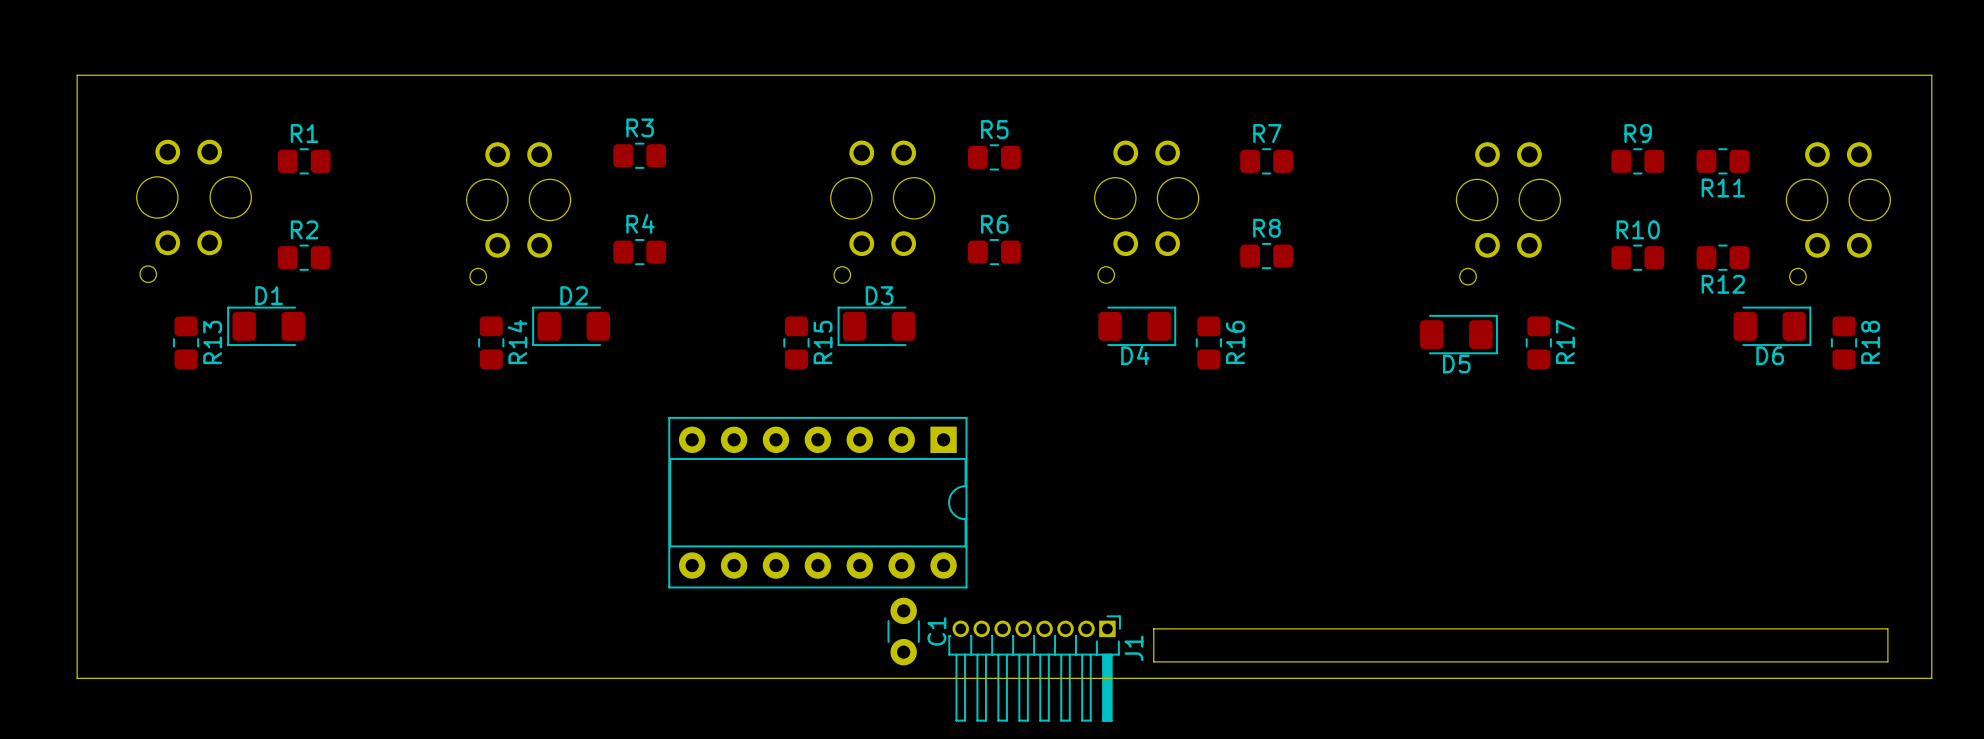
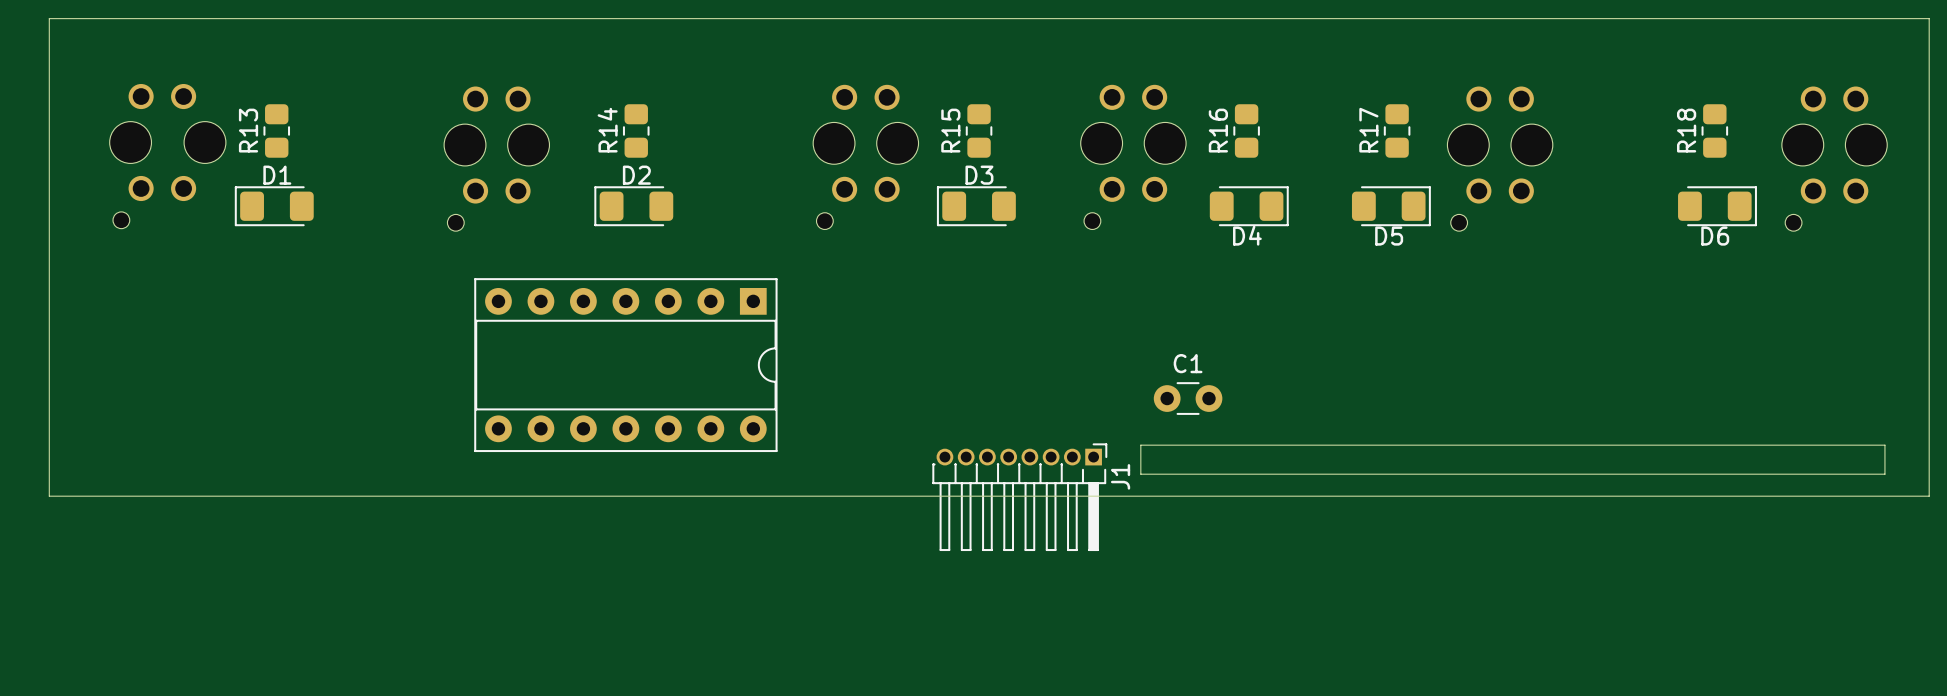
R3: (639, 155) -> none
R5: (994, 157) -> none
R1: (304, 161) -> none
R7: (1266, 161) -> none
R9: (1637, 161) -> none
R11: (1722, 161) -> none
R4: (639, 252) -> none
R6: (994, 252) -> none
R8: (1266, 256) -> none
R2: (304, 257) -> none
R10: (1637, 257) -> none
R12: (1722, 257) -> none
D1 position: (266, 326) -> (274, 206)
D2 position: (571, 326) -> (633, 206)
D3 position: (876, 326) -> (976, 206)
D4 position: (1137, 326) -> (1249, 206)
D6 position: (1772, 326) -> (1717, 206)
D5 position: (1458, 334) -> (1391, 206)
R13 position: (186, 342) -> (276, 130)
R13 name position: R13 (212, 342) -> R13 (248, 130)
R14 position: (491, 342) -> (636, 130)
R14 name position: R14 (517, 342) -> R14 (607, 130)
R15 position: (796, 342) -> (979, 130)
R15 name position: R15 (823, 342) -> R15 (950, 130)
R16 position: (1208, 342) -> (1246, 130)
R16 name position: R16 (1235, 342) -> R16 (1218, 130)
R17 position: (1538, 342) -> (1397, 130)
R17 name position: R17 (1565, 342) -> R17 (1368, 130)
R18 position: (1844, 342) -> (1714, 130)
R18 name position: R18 (1870, 342) -> R18 (1686, 130)
board edge: none -> (1140, 445) (1884, 445) (1884, 474) (1140, 474) (1140, 445)
part position: (817, 502) -> (625, 365)
board edge: (77, 546) (77, 678) (1931, 678) (1931, 546) -> (49, 496) (1929, 496)
board edge: (1153, 628) (1887, 628) (1887, 661) (1153, 661) (1153, 628) -> none
C1 rotation: 0° (903, 631) -> 90° clockwise (1188, 398)
C1 position: (903, 631) -> (1188, 398)
C1 name position: C1 (936, 631) -> C1 (1188, 363)
J1 position: (1034, 668) -> (1019, 497)

